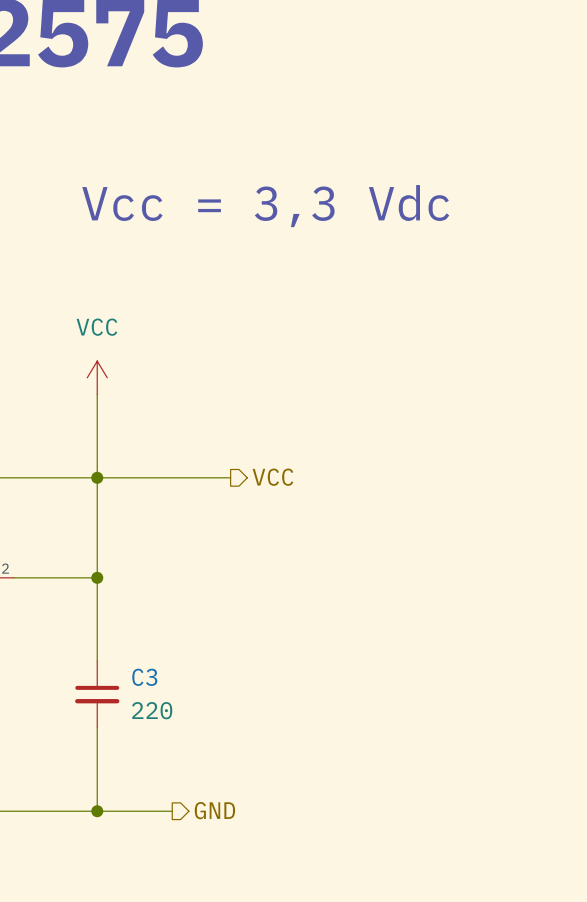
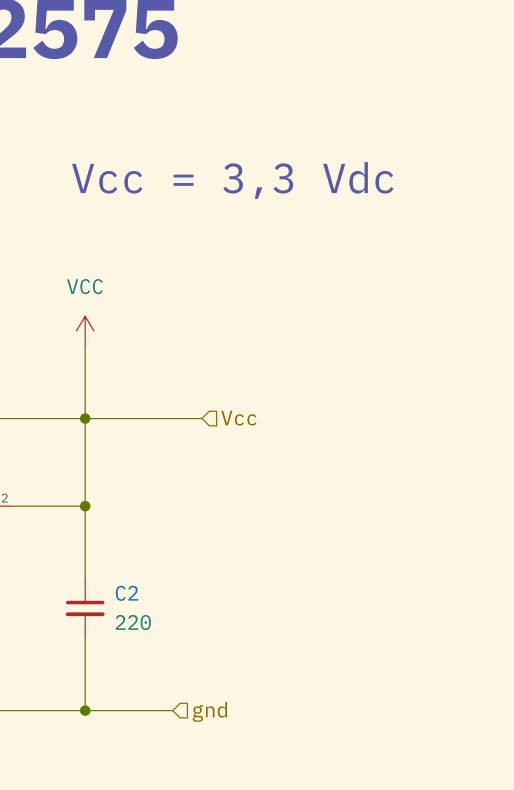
hierarchical label shape: output (272, 477) -> input (238, 418)
hierarchical label: VCC (272, 477) -> Vcc (238, 418)
C3 name: C3 (144, 677) -> C2 (127, 593)
hierarchical label: GND (214, 810) -> none
wire: none -> (150, 710) (172, 710)
hierarchical label: none -> gnd (209, 711)

